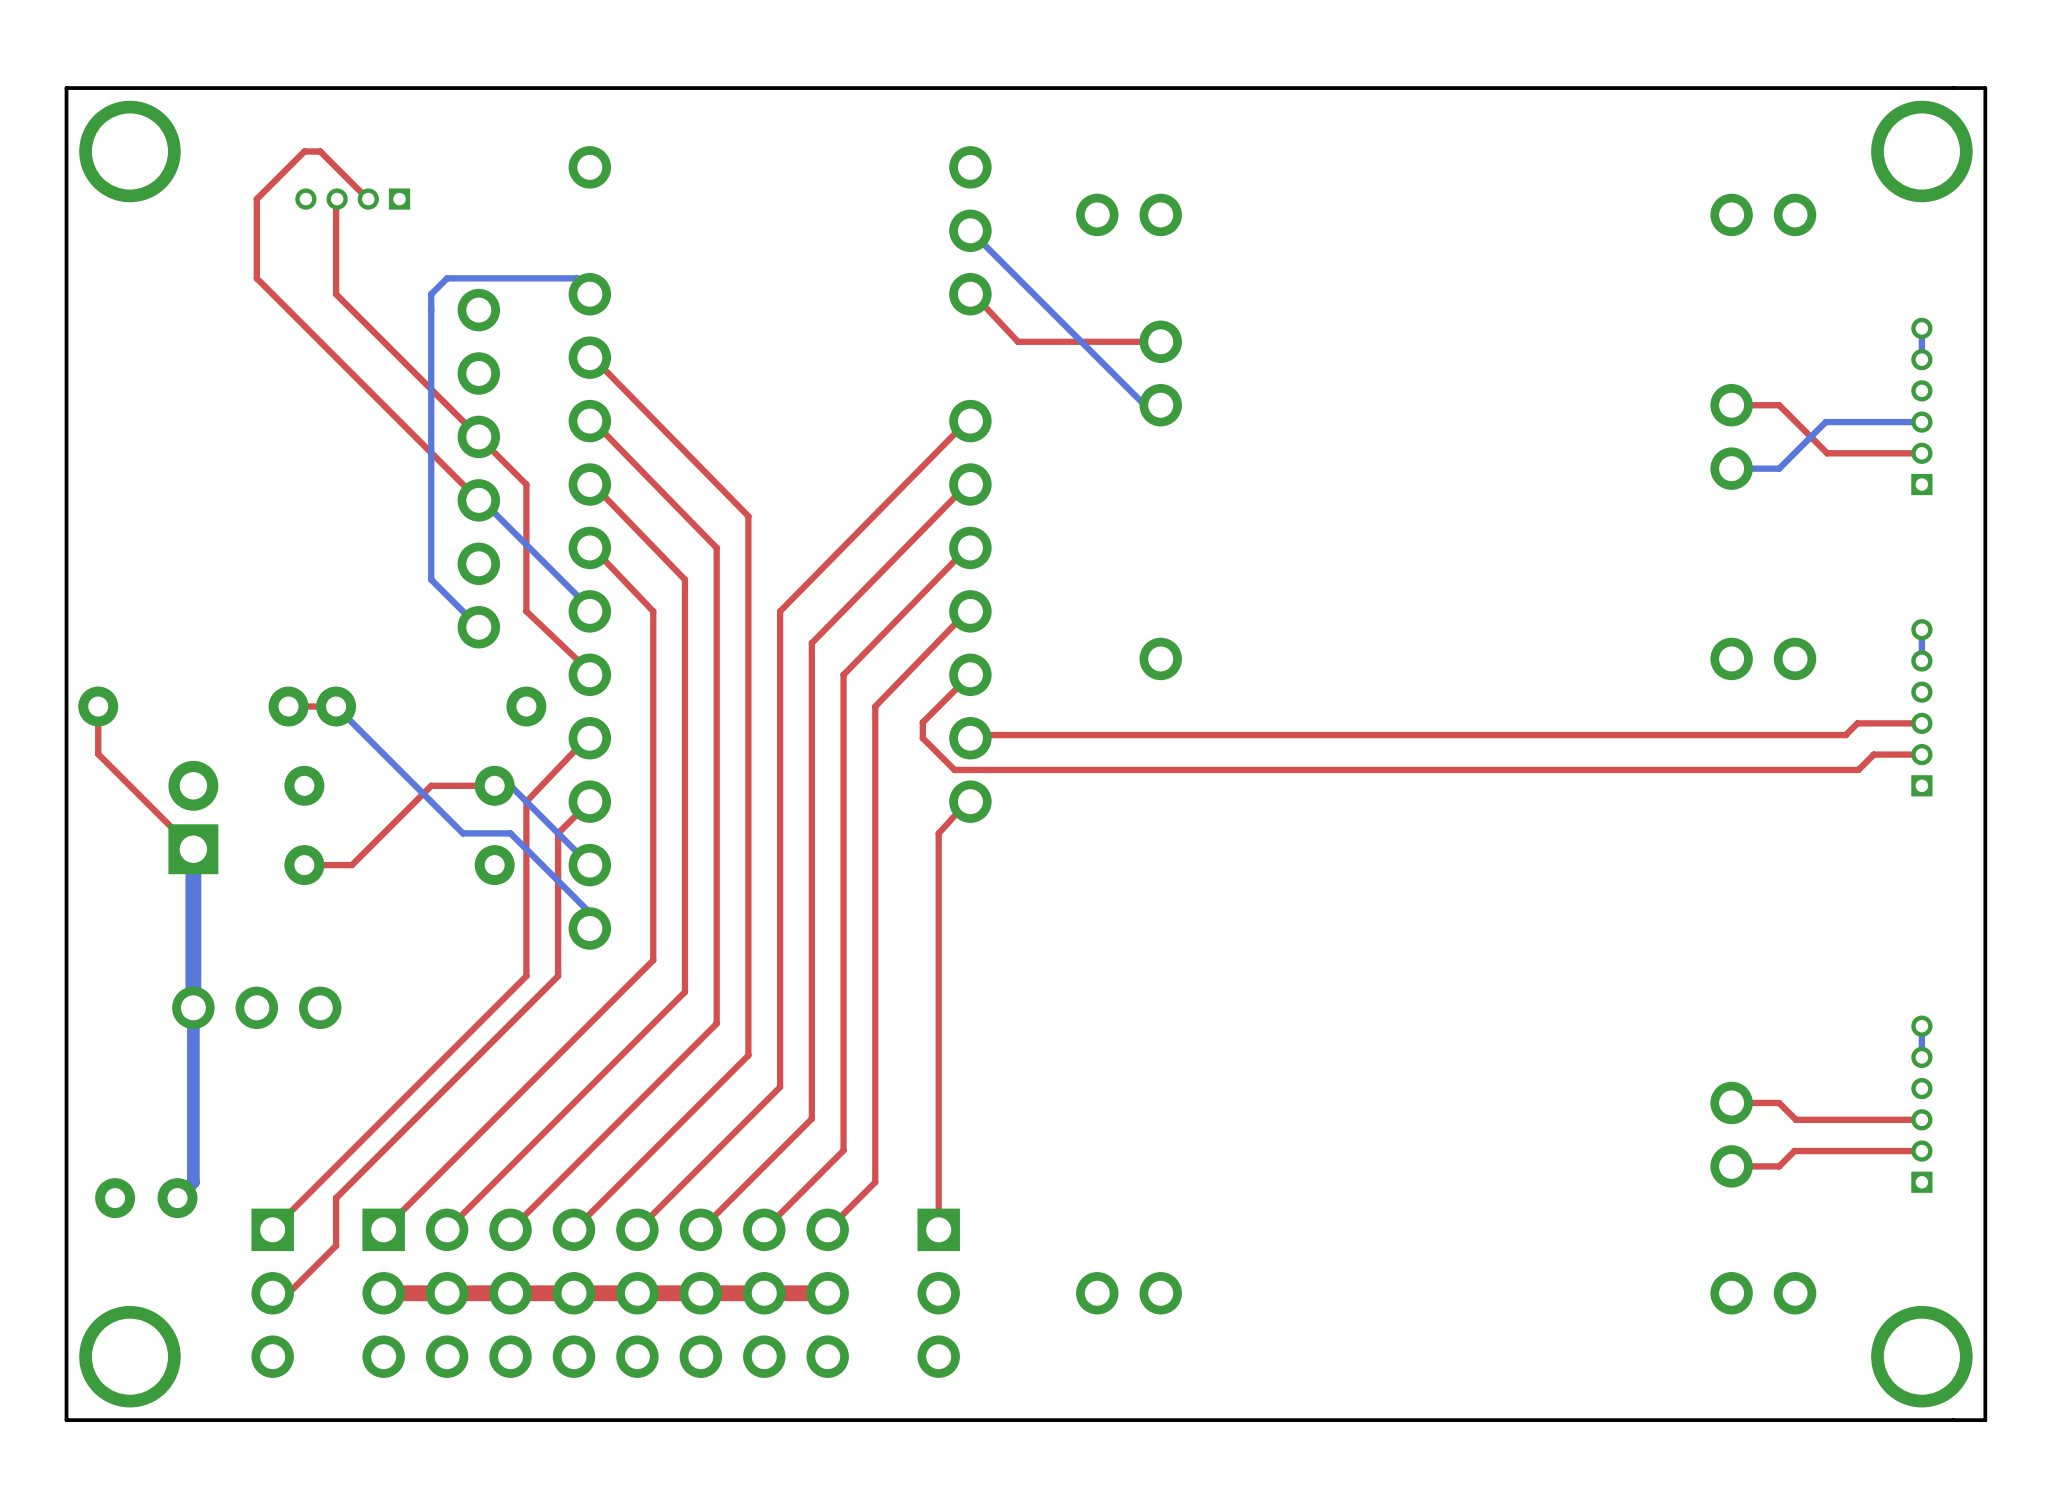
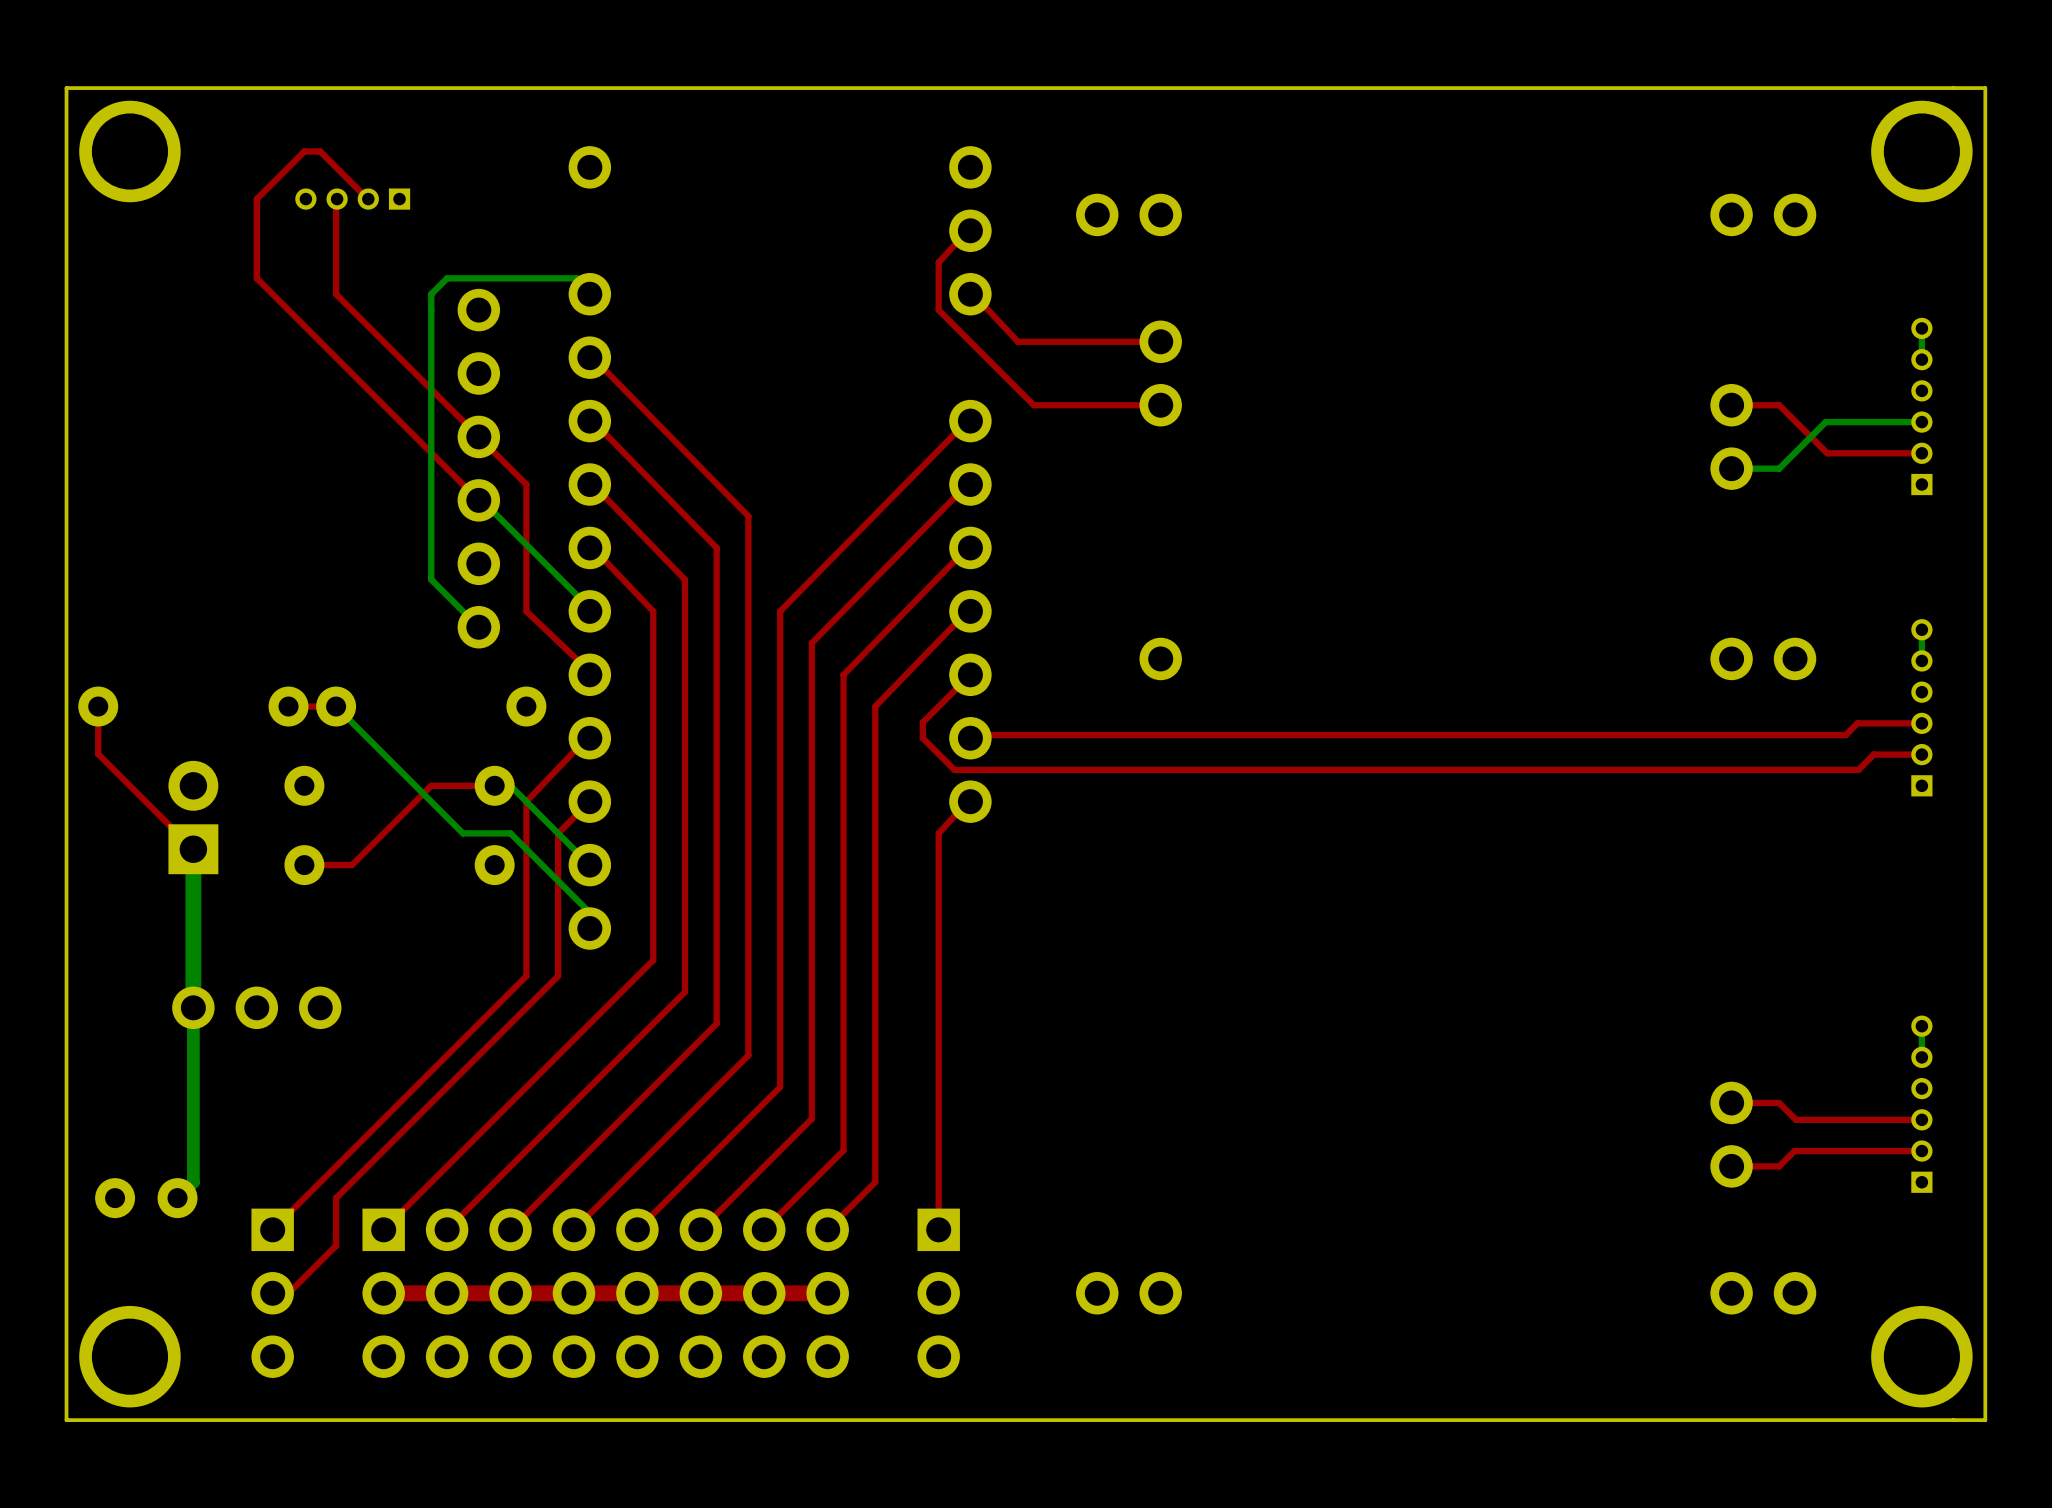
top track: none -> (970, 227) (938, 262) (938, 310) (1033, 405) (1160, 405)
bottom track: (970, 230) (1144, 405) (1160, 405) -> none

